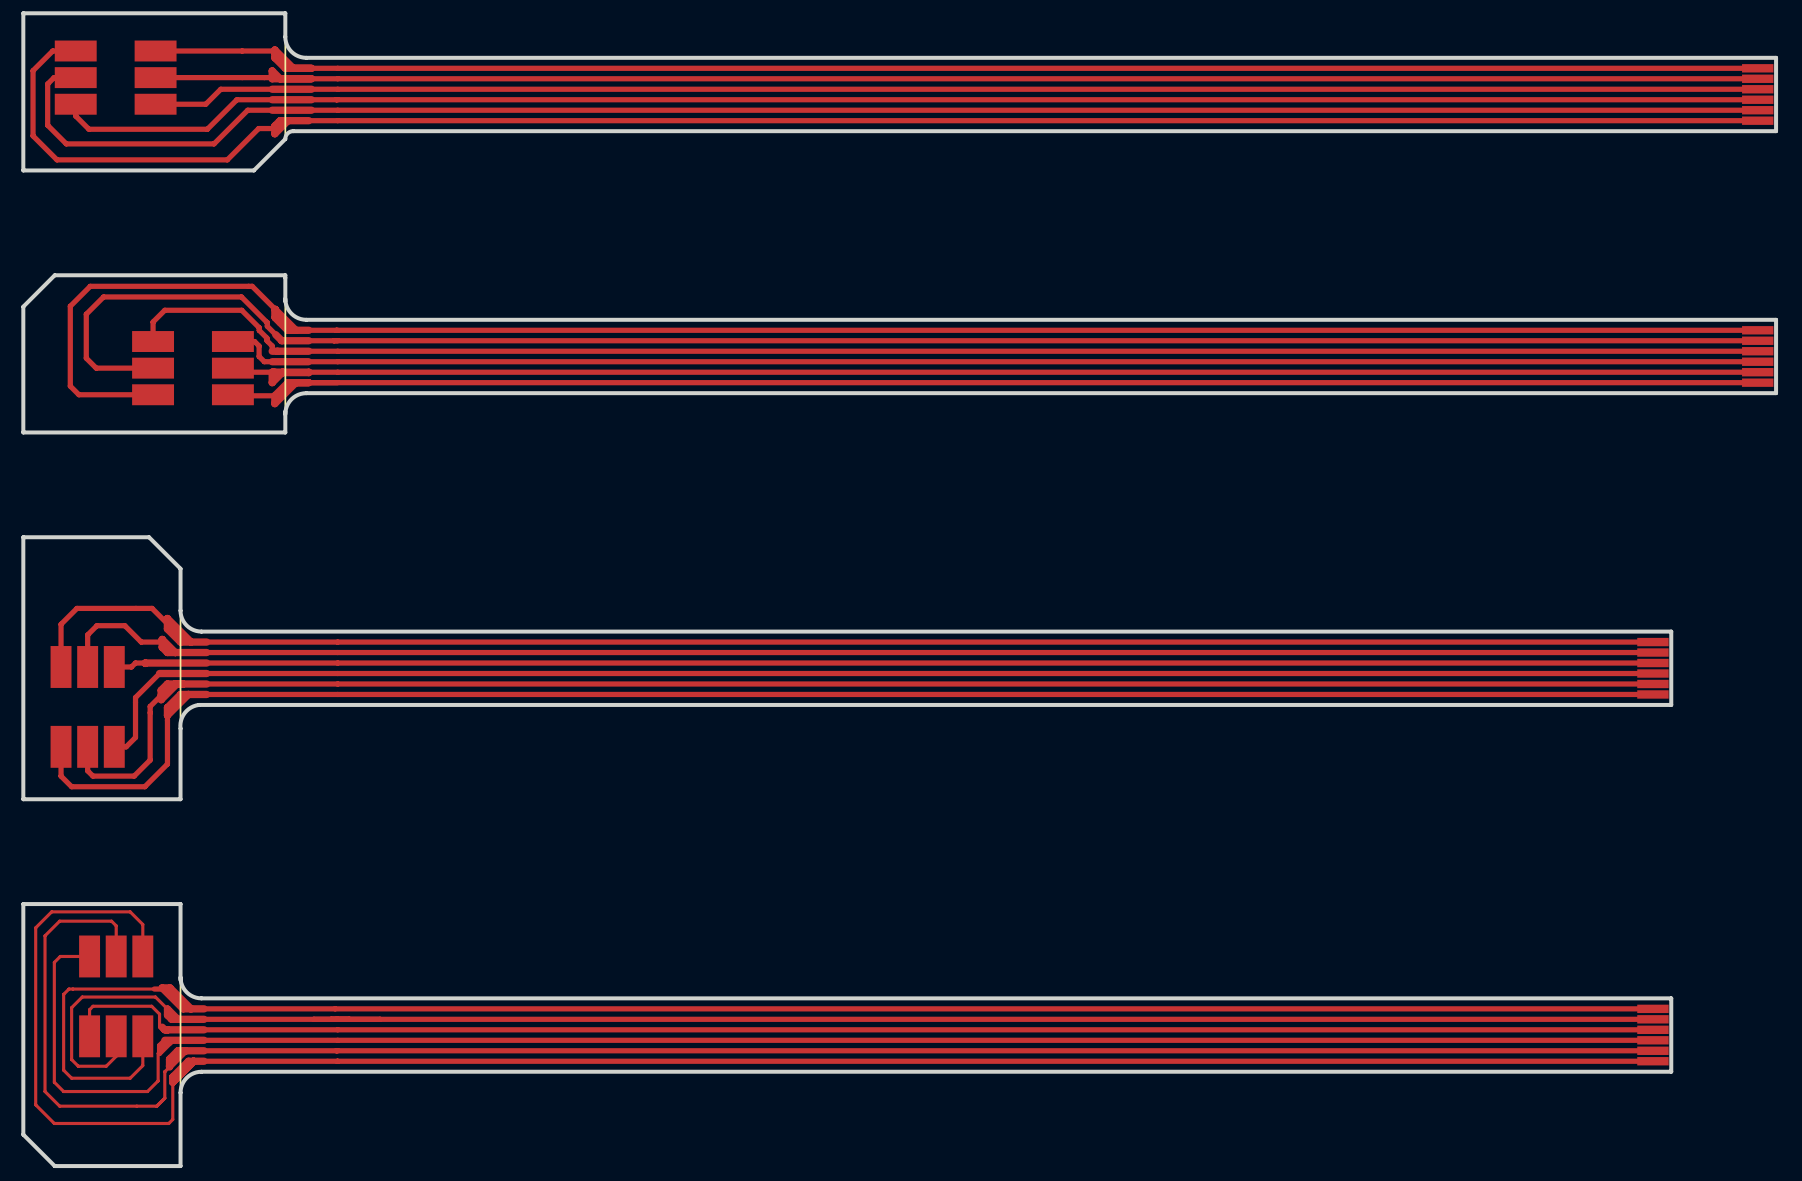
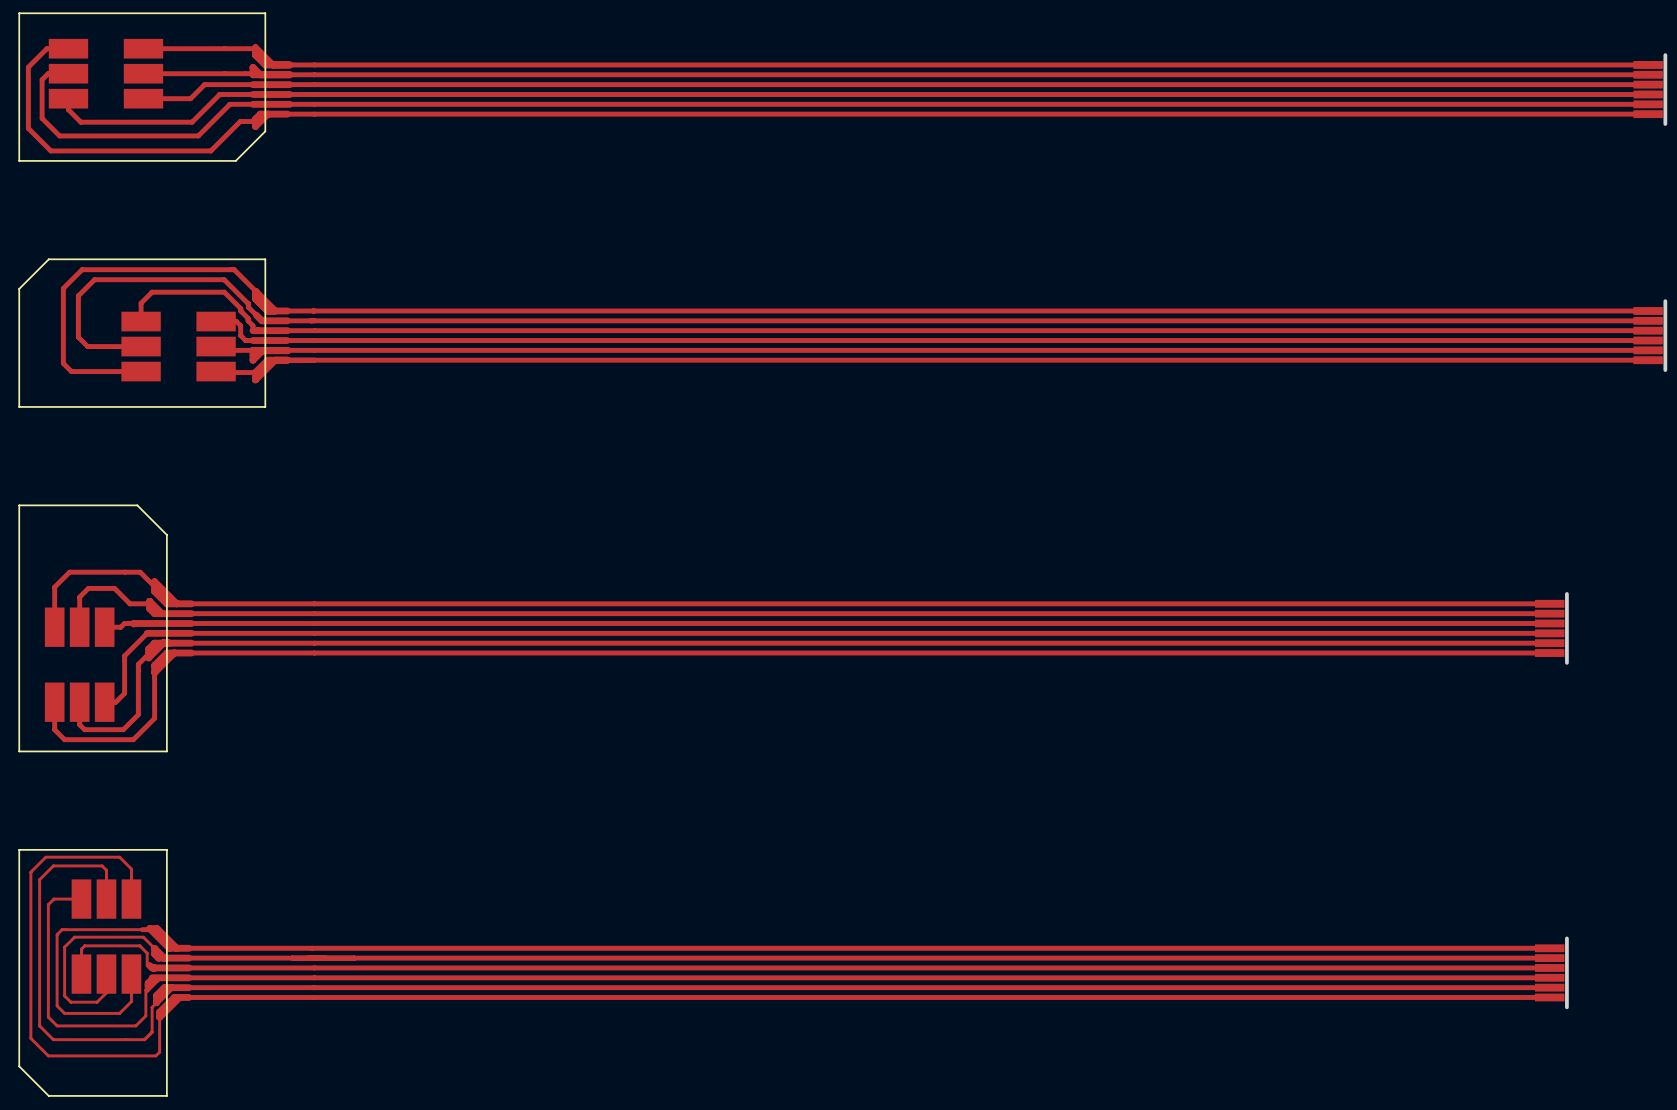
board edge: (1776, 57) (306, 57) (293, 53) (286, 44) (285, 13) (23, 13) (23, 170) (253, 170) (285, 139) (287, 133) (293, 131) (1776, 131) -> none
board edge: (285, 298) (286, 306) (291, 313) (298, 318) (306, 319) (1776, 319) -> none
board edge: (285, 301) (285, 275) (54, 275) (23, 306) (23, 432) (285, 432) (285, 411) -> none
board edge: (1776, 393) (306, 393) (298, 394) (291, 399) (286, 406) (285, 414) -> none
board edge: (1671, 631) (201, 631) (188, 627) (181, 616) (180, 568) (149, 537) (23, 537) (23, 799) (180, 799) (180, 723) (186, 710) (198, 704) (1671, 704) -> none
board edge: (180, 977) (182, 985) (186, 992) (193, 996) (201, 998) (1671, 998) -> none
board edge: (180, 980) (180, 904) (23, 904) (23, 1134) (54, 1166) (180, 1166) (181, 1087) (188, 1076) (201, 1071) (1671, 1071) -> none

